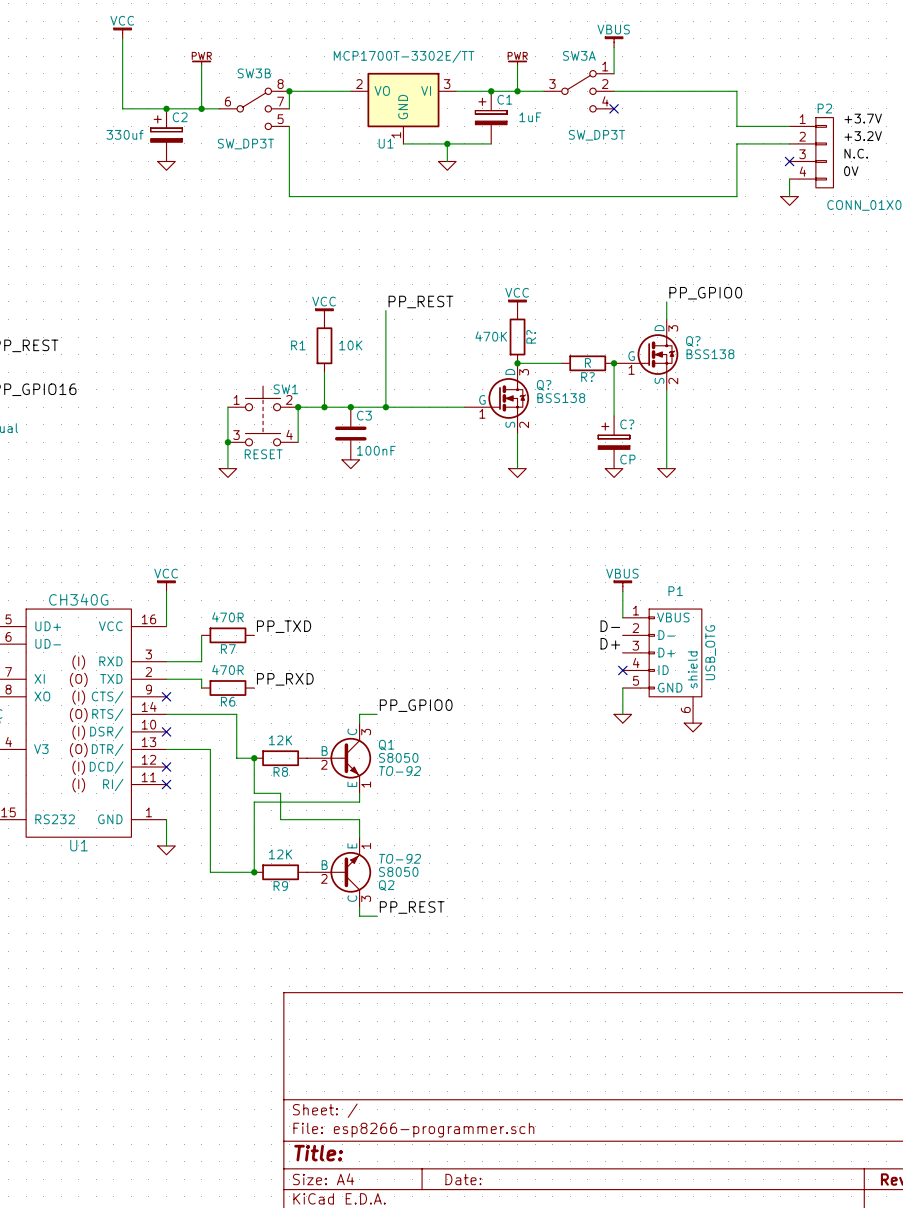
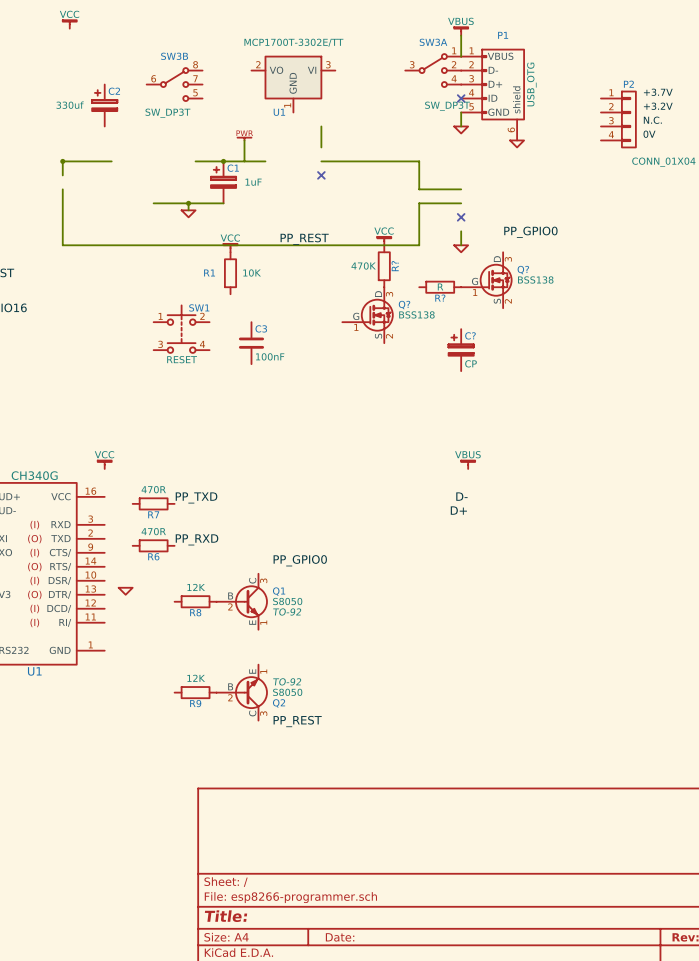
wire: (122, 38) (122, 108) (219, 108) -> none
power symbol: (201, 62) -> none
power symbol: (517, 62) -> none
wire: (201, 64) (201, 108) -> none
wire: (517, 64) (517, 91) -> (321, 126) (321, 147)
junction: (289, 91) -> none
wire: (350, 91) (289, 91) (289, 108) -> none
wire: (456, 91) (543, 91) -> none
junction: (491, 91) -> none
junction: (517, 91) -> none
wire: (614, 91) (736, 91) (736, 126) (789, 126) -> none
junction: (166, 108) -> none
junction: (201, 108) -> none
no-connect mark position: (614, 108) -> (461, 98)
C1 position: (491, 117) -> (223, 182)
wire: (289, 126) (289, 196) (736, 196) (736, 143) (789, 143) -> none
wire: (403, 143) (491, 143) -> (195, 161) (265, 161)
wire: (447, 143) (447, 161) -> (461, 112) (461, 126)
junction: (447, 143) -> none
no-connect mark: (789, 161) -> none
power symbol: (166, 165) -> none
power symbol: (447, 165) -> none
power symbol: none -> (461, 129)
power symbol: none -> (244, 138)
wire: none -> (244, 140) (244, 161)
wire: (789, 179) (789, 196) -> none
power symbol: none -> (517, 143)
power symbol: (789, 200) -> none
junction: none -> (62, 161)
wire: none -> (111, 161) (62, 161) (62, 175)
junction: none -> (223, 161)
wire: none -> (321, 161) (419, 161) (419, 189) (461, 189)
no-connect mark: none -> (321, 175)
wire: none -> (62, 189) (62, 245) (419, 245) (419, 203) (461, 203)
wire: none -> (153, 203) (223, 203)
wire: none -> (188, 203) (188, 210)
junction: none -> (188, 203)
power symbol: none -> (188, 213)
no-connect mark: none -> (461, 217)
wire: (666, 301) (666, 319) -> (461, 231) (461, 245)
wire: (385, 310) (385, 407) -> none
power symbol: none -> (461, 248)
wire: (517, 363) (561, 363) -> none
junction: (517, 363) -> none
wire: (614, 363) (614, 415) -> none
junction: (614, 363) -> none
wire: (324, 372) (324, 407) -> none
wire: (666, 389) (666, 468) -> none
wire: (227, 407) (227, 468) -> none
junction: (298, 407) -> none
junction: (324, 407) -> none
junction: (350, 407) -> none
junction: (385, 407) -> none
wire: (464, 407) (298, 407) (298, 442) -> none
wire: (517, 433) (517, 468) -> none
junction: (227, 442) -> none
power symbol: (350, 464) -> none
power symbol: (227, 473) -> none
power symbol: (517, 473) -> none
power symbol: (614, 473) -> none
power symbol: (666, 473) -> none
wire: (166, 591) (166, 626) -> none
wire: (622, 591) (622, 617) -> none
wire: (201, 635) (201, 661) (166, 661) -> none
P1 position: (662, 666) -> (492, 95)
no-connect mark: (622, 670) -> none
wire: (166, 679) (201, 679) (201, 688) -> none
wire: (622, 688) (622, 714) -> none
no-connect mark: (166, 696) -> none
wire: (166, 714) (236, 714) (236, 758) (254, 758) (254, 793) (280, 793) (280, 819) (359, 819) (359, 837) -> none
wire: (377, 714) (359, 714) (359, 723) -> none
power symbol: (622, 718) -> none
power symbol: (693, 727) -> none
no-connect mark: (166, 731) -> none
wire: (166, 749) (210, 749) (210, 872) (254, 872) (254, 802) (359, 802) (359, 793) -> none
junction: (254, 758) -> none
no-connect mark: (166, 767) -> none
no-connect mark: (166, 784) -> none
wire: (166, 819) (166, 845) -> none
power symbol position: (166, 850) -> (125, 591)
junction: (254, 872) -> none
wire: (359, 907) (359, 916) (377, 916) -> none

